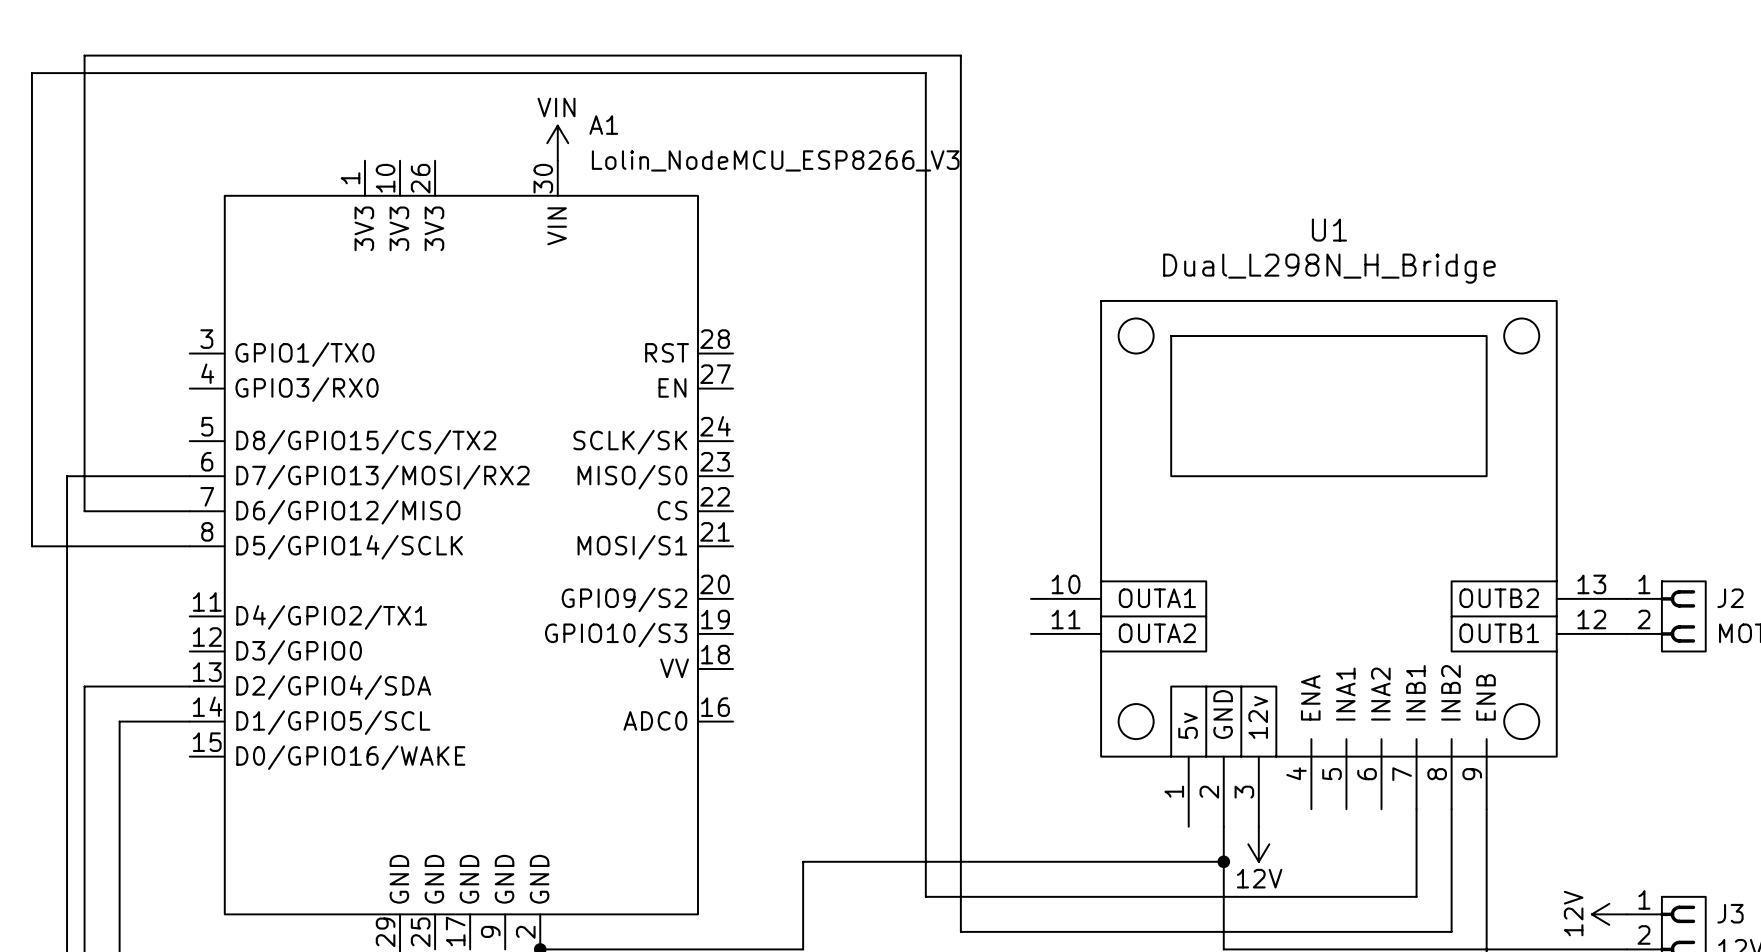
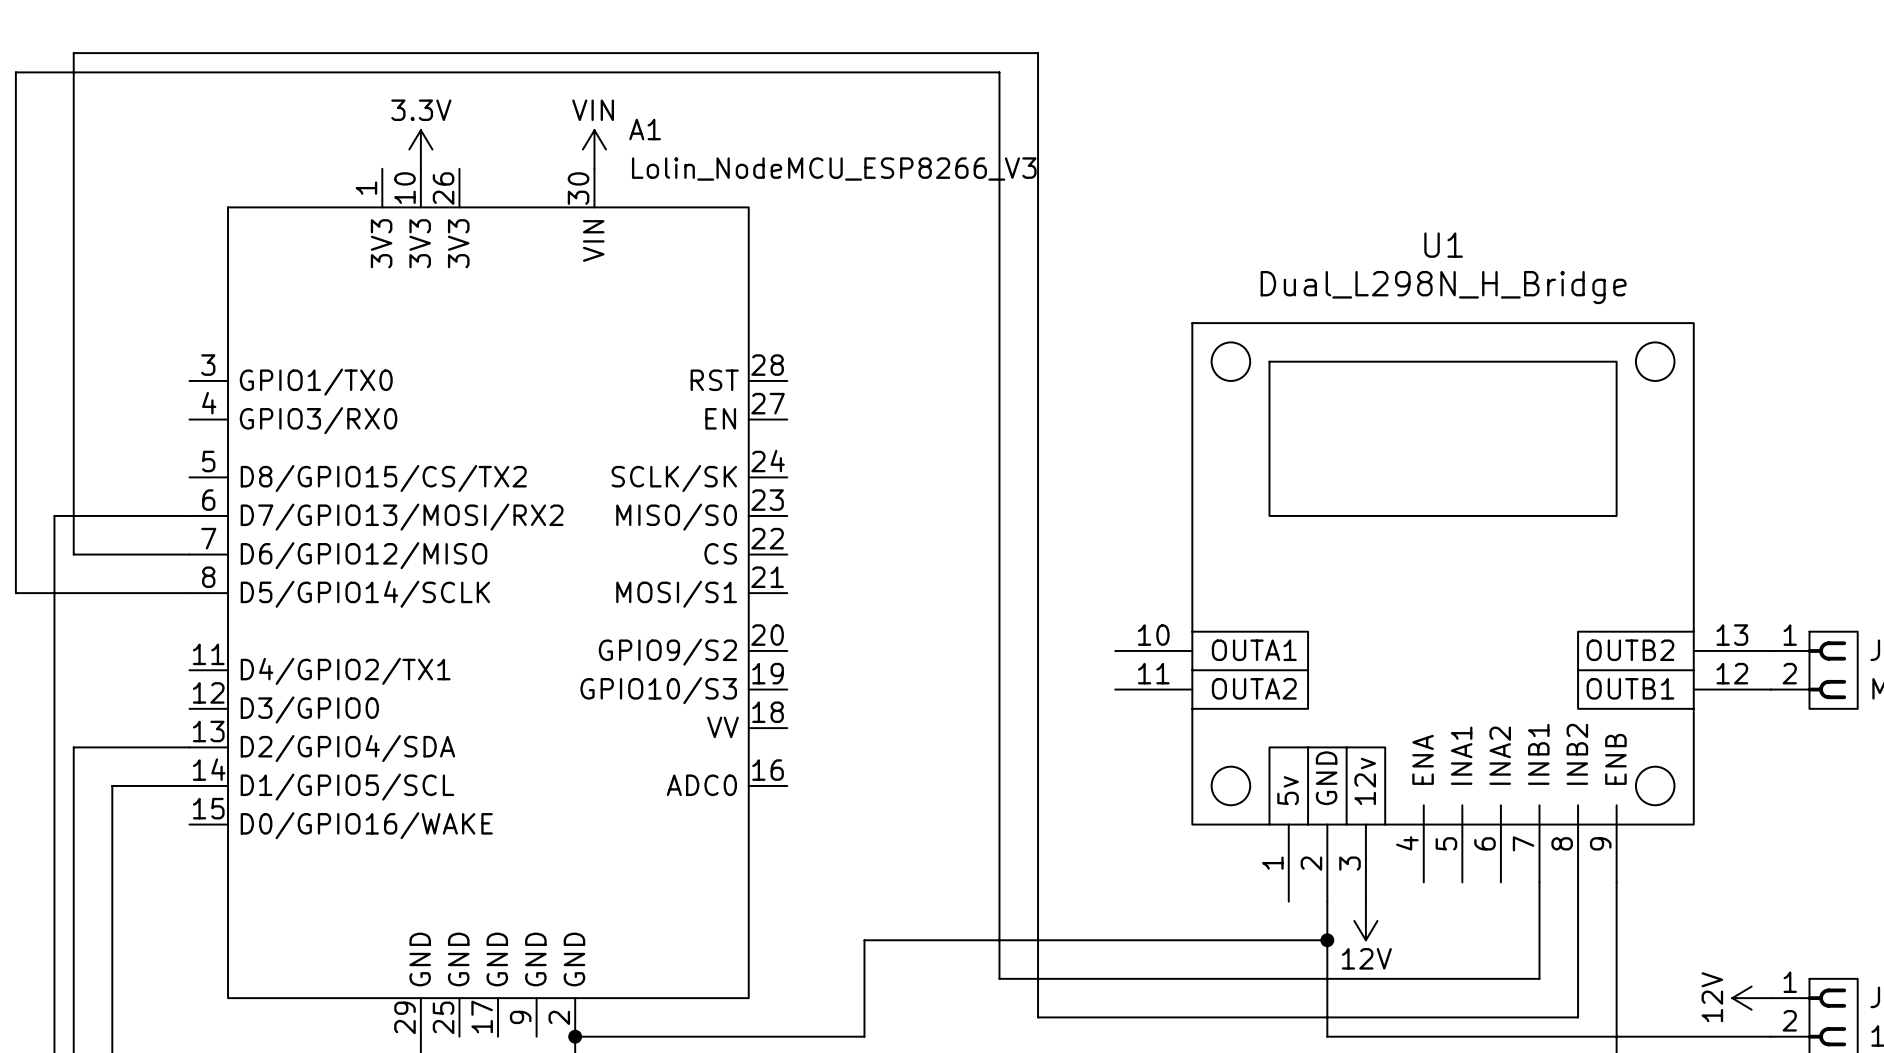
power symbol: none -> 3.3V (420, 149)

